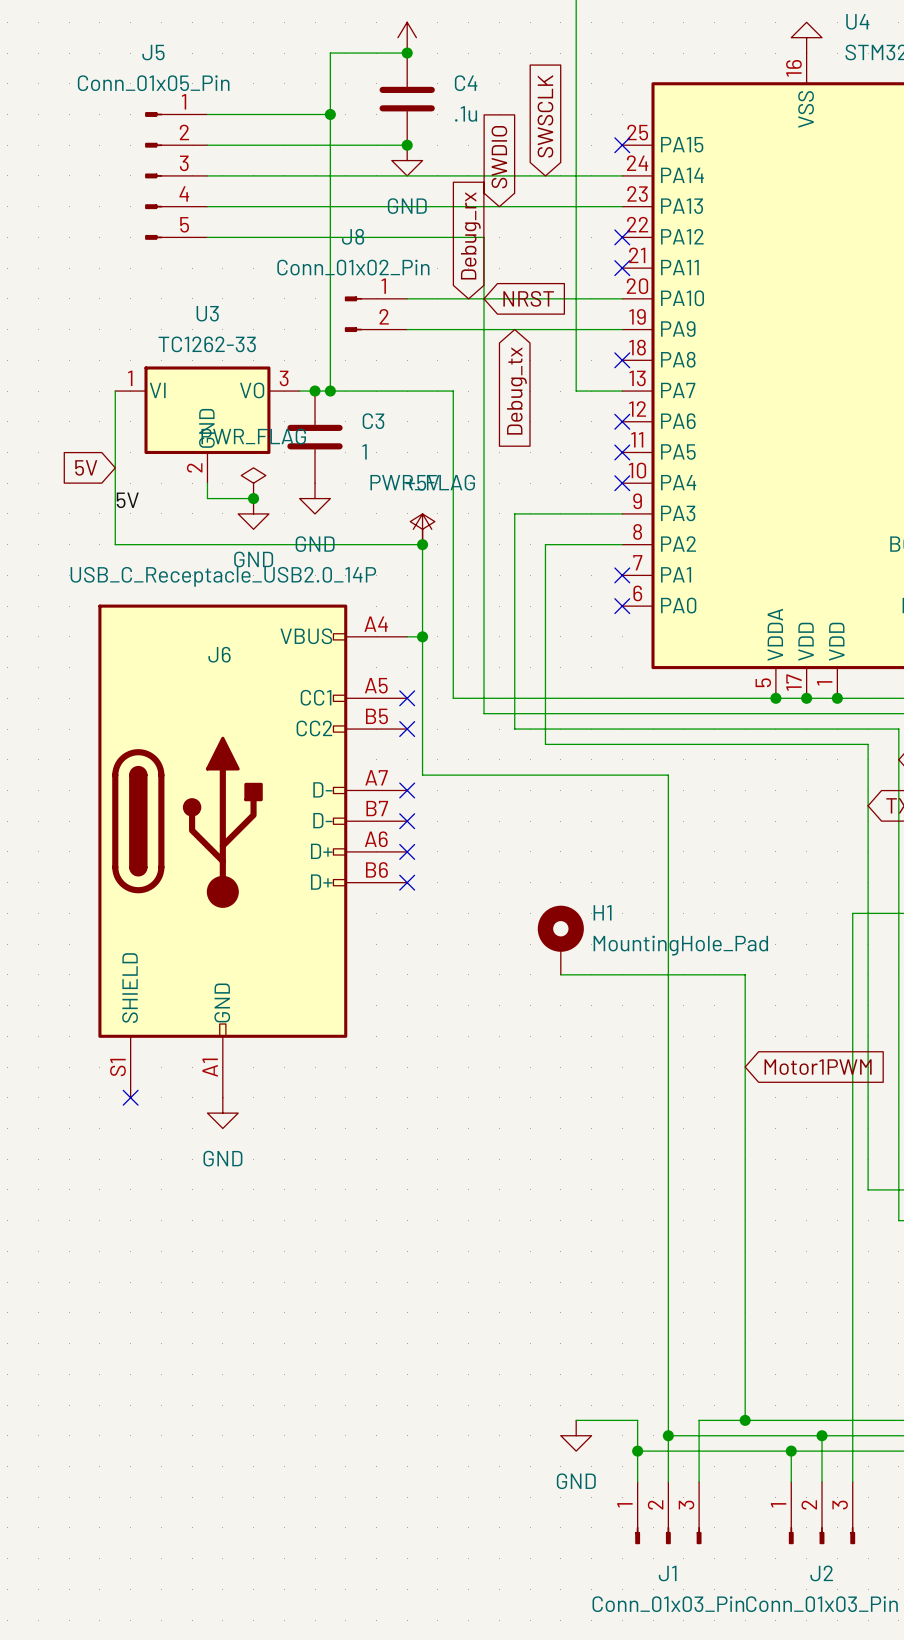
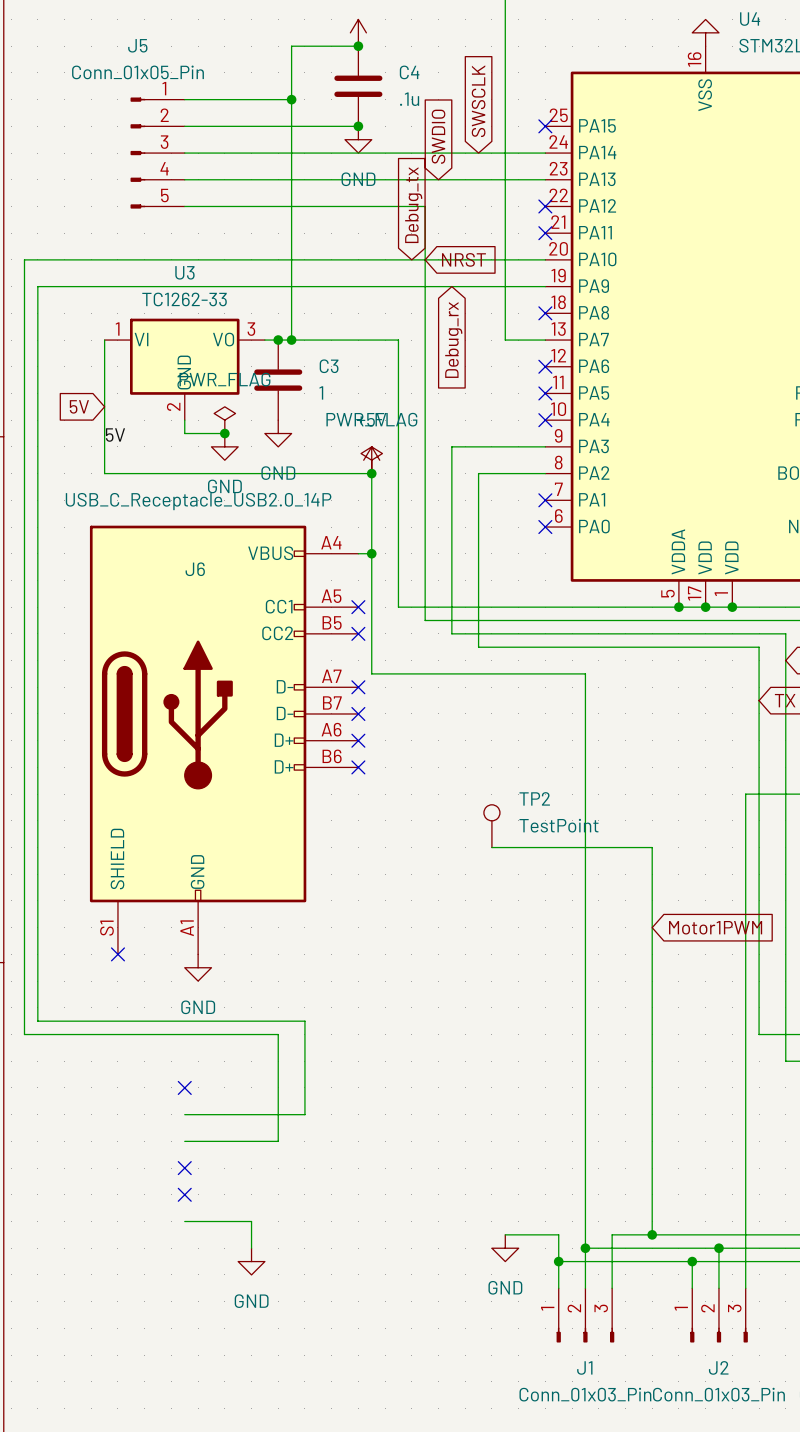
global label: Debug_rx (470, 235) -> Debug_tx (413, 205)
wire: none -> (358, 259) (24, 259) (24, 1034) (278, 1034) (278, 1141) (184, 1141)
J8: Conn_01x02_Pin (376, 314) -> none
wire: none -> (358, 286) (37, 286) (37, 1021) (304, 1021) (304, 1114) (184, 1114)
global label: Debug_tx (516, 391) -> Debug_rx (453, 340)
H1: MountingHole_Pad (560, 940) -> none
TP2: none -> TestPoint (491, 826)
no-connect mark: none -> (184, 1087)
no-connect mark: none -> (184, 1168)
no-connect mark: none -> (184, 1194)
wire: none -> (184, 1221) (251, 1221) (251, 1248)
power symbol: none -> GND (251, 1261)

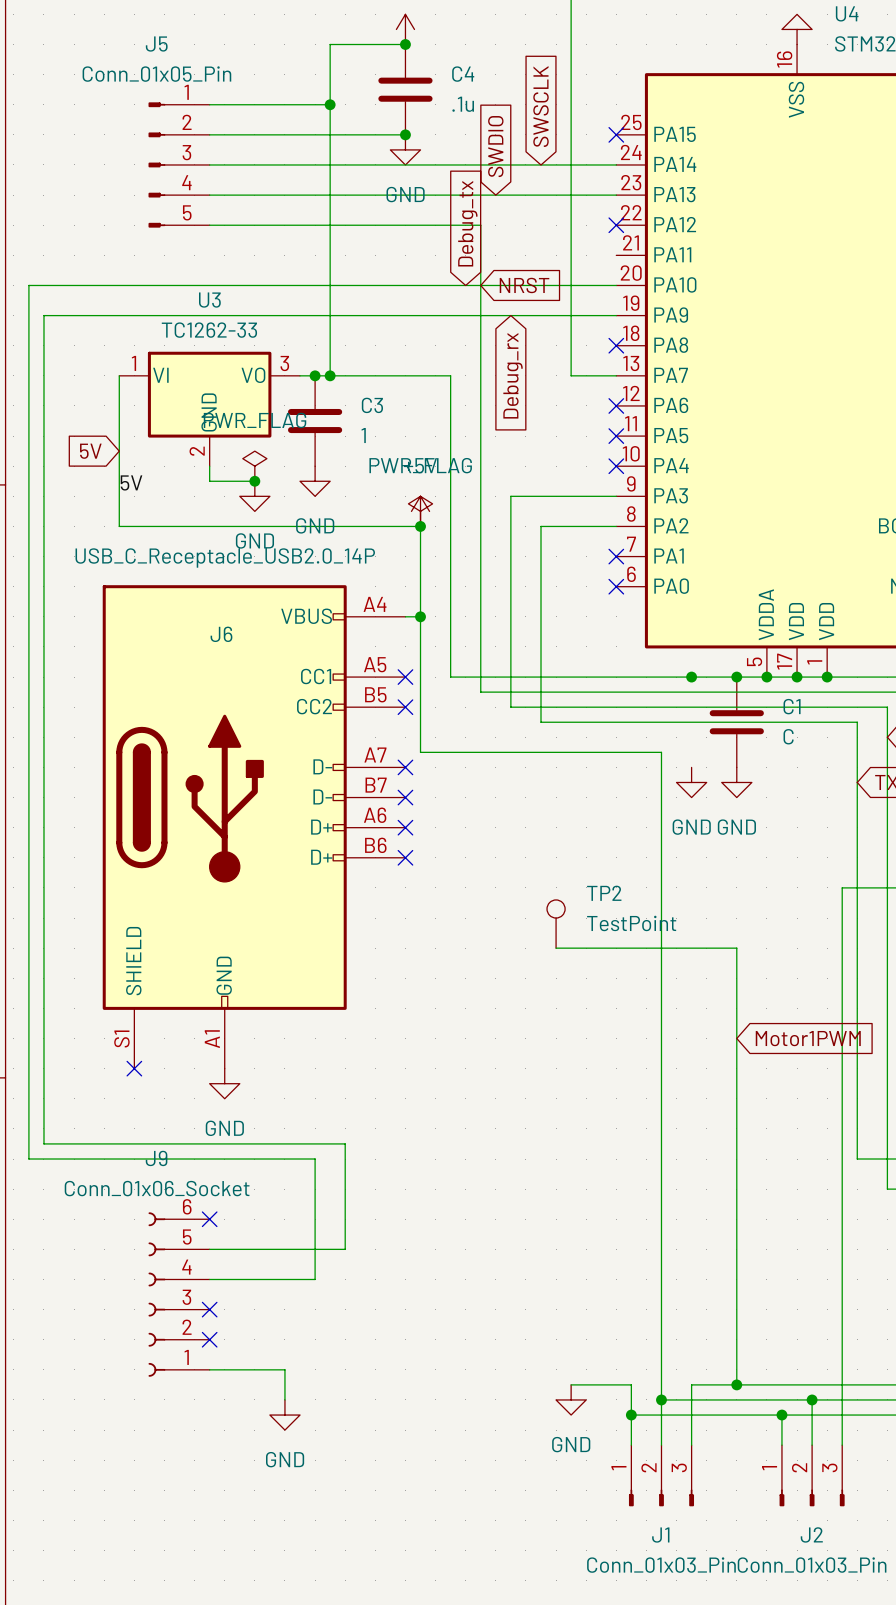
no-connect mark: (545, 233) -> none
junction: none -> (691, 677)
junction: none -> (736, 677)
C1: none -> C (736, 722)
power symbol: none -> GND (691, 782)
power symbol: none -> GND (736, 782)
J9: none -> Conn_01x06_Socket (179, 1294)

